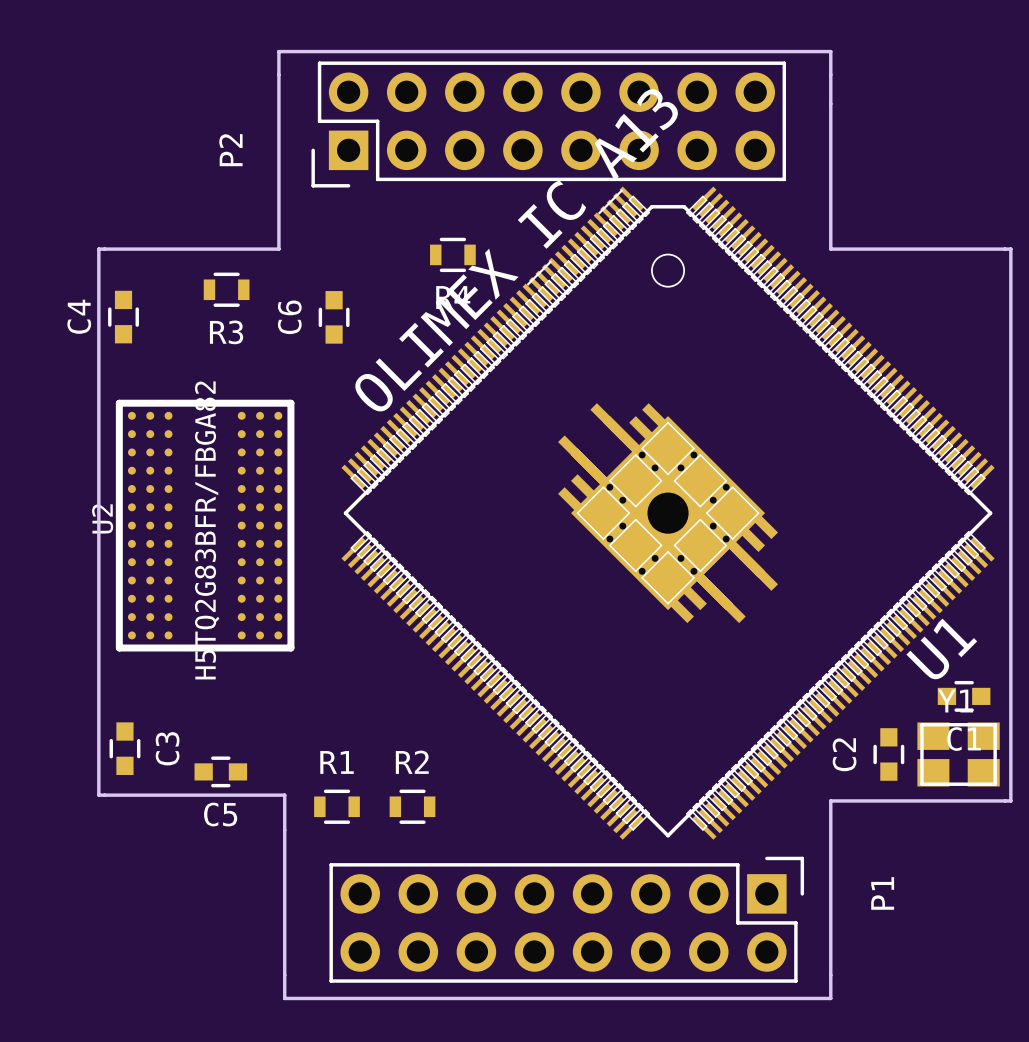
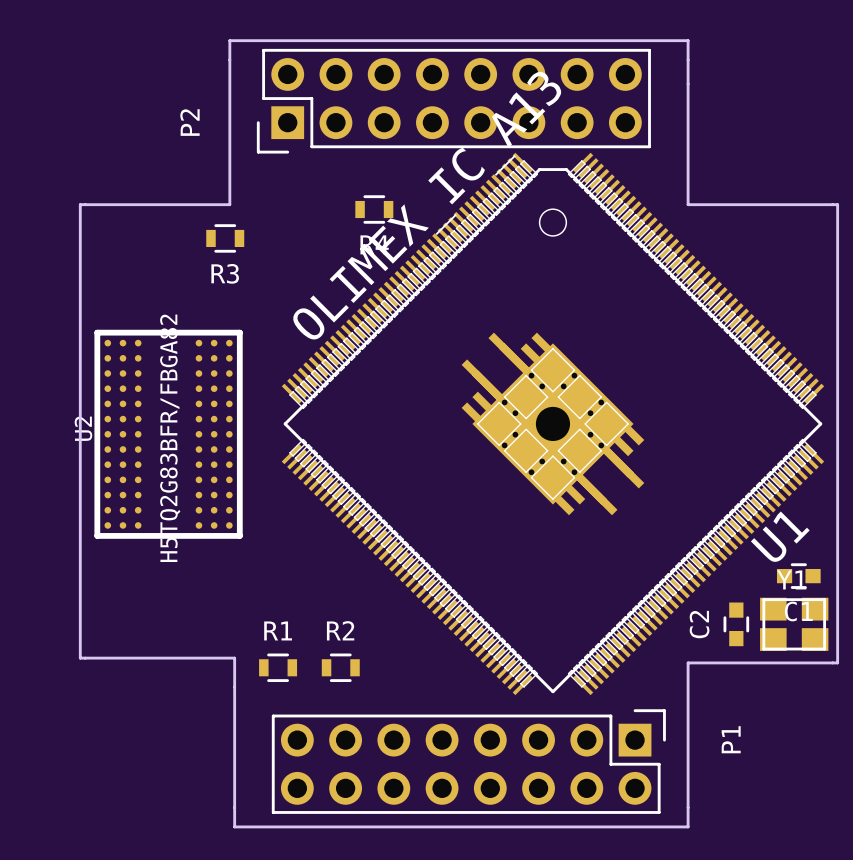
R3 position: (226, 289) -> (225, 238)
C4: (123, 317) -> none
C6: (334, 317) -> none
C3: (124, 748) -> none
C5: (220, 771) -> none

